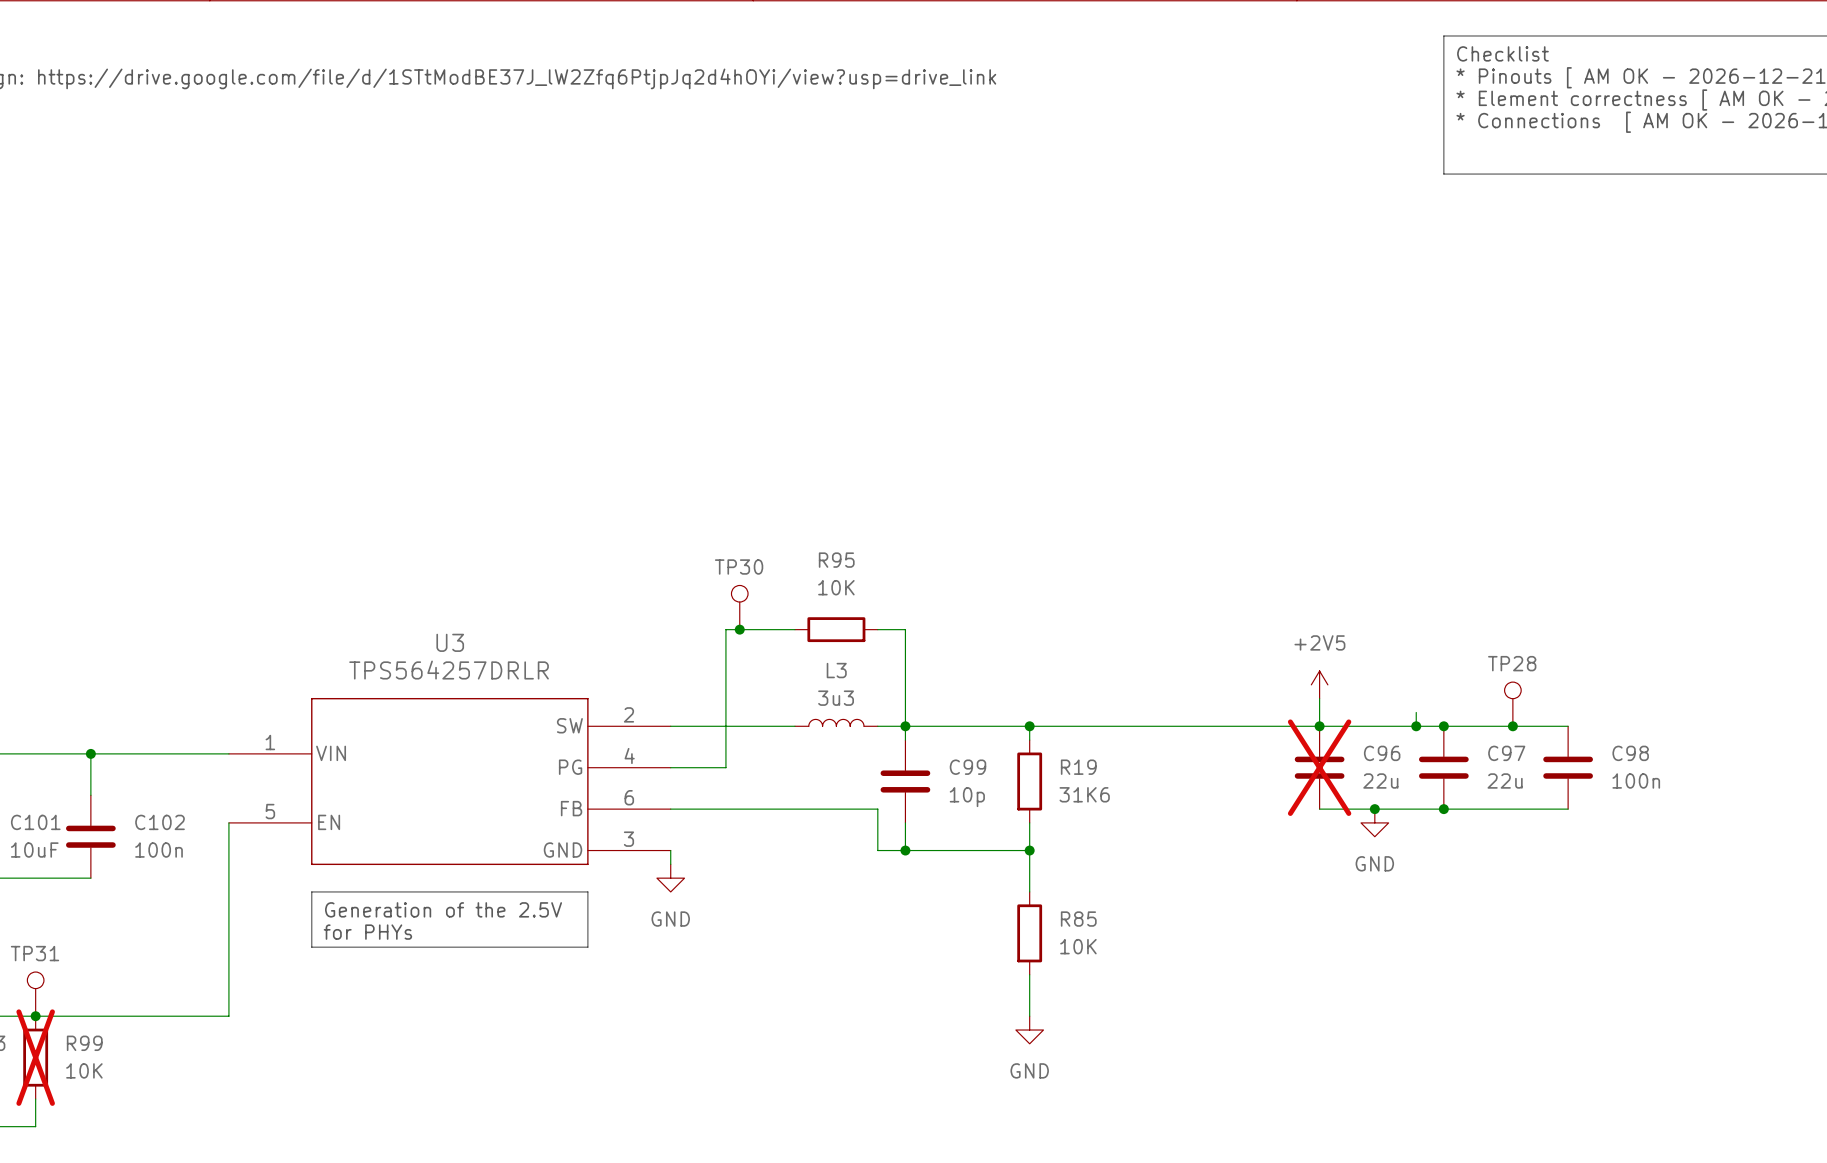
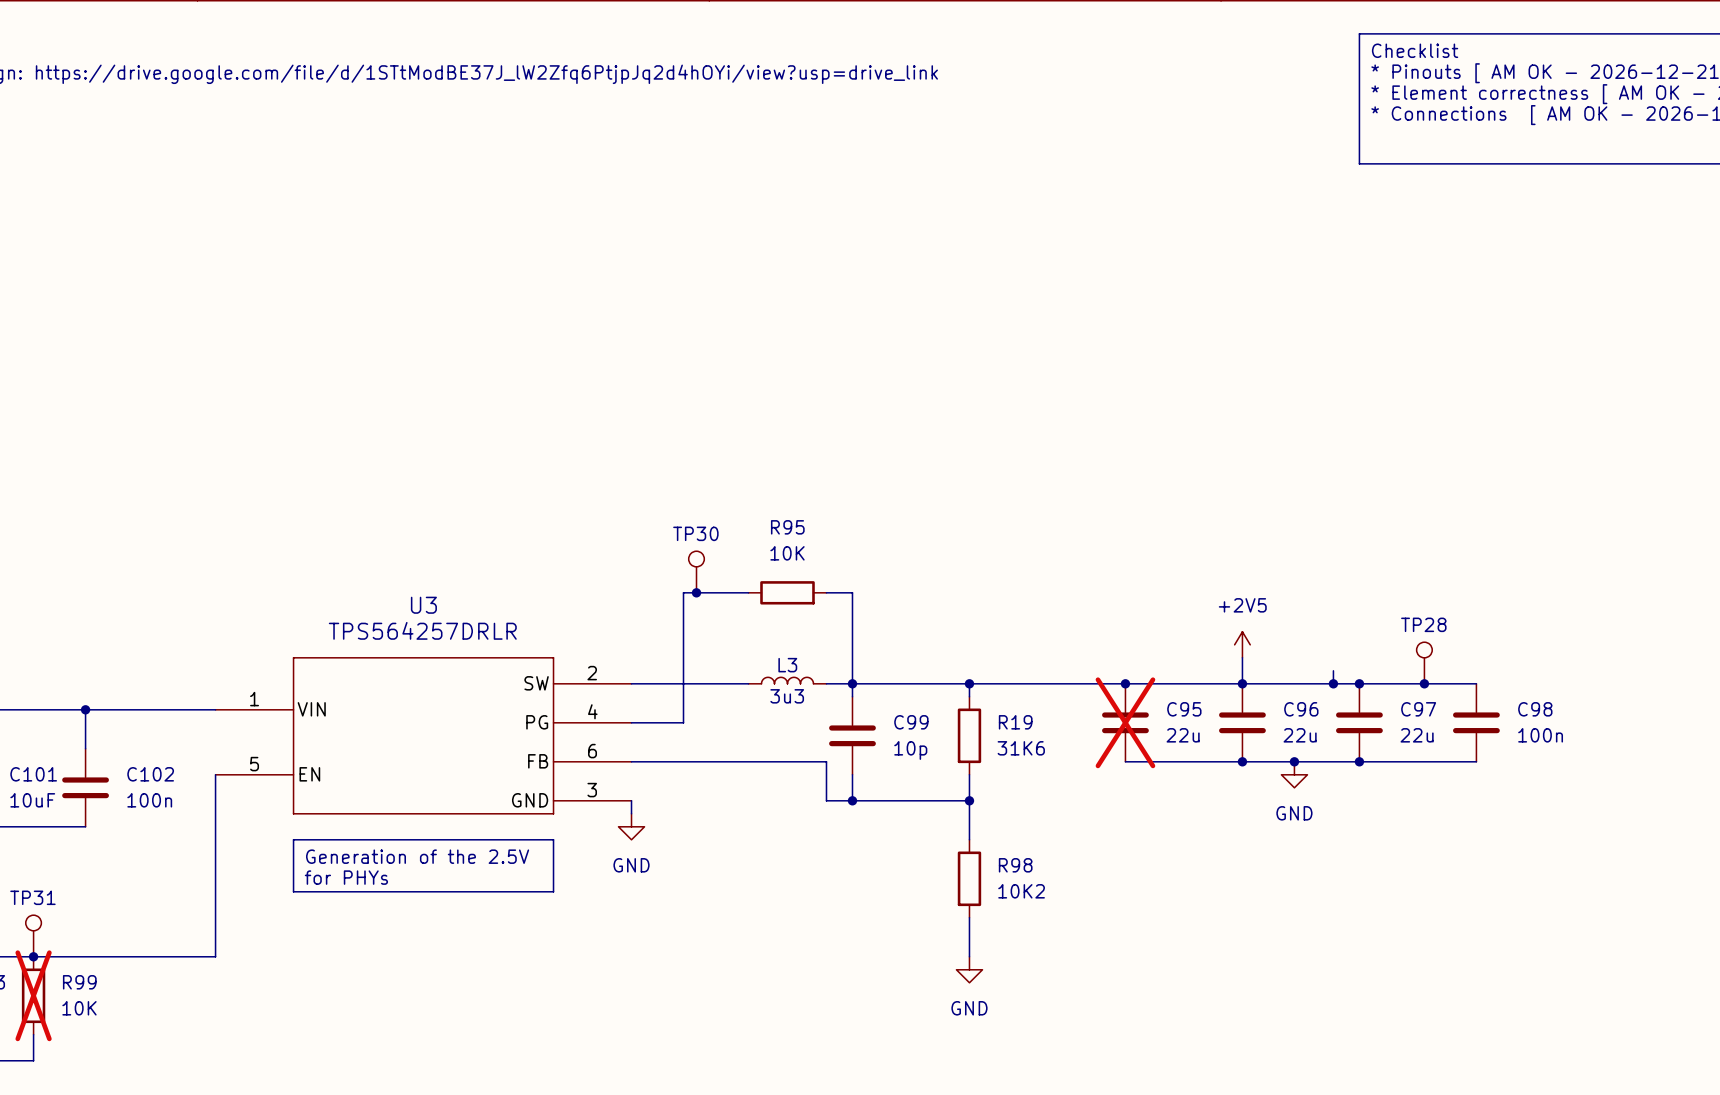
L3 name position: L3 (836, 670) -> L3 (787, 665)
L3 value position: 3u3 (836, 698) -> 3u3 (787, 696)
junction: none -> (1125, 683)
C95: none -> 22u (1125, 722)
C96 do-not-place cross: (1319, 767) -> none
wire: none -> (1125, 761) (1242, 761)
junction: none -> (1242, 761)
R85 name: R85 (1078, 919) -> R98 (1015, 865)
R85 value: 10K (1078, 946) -> 10K2 (1021, 891)

